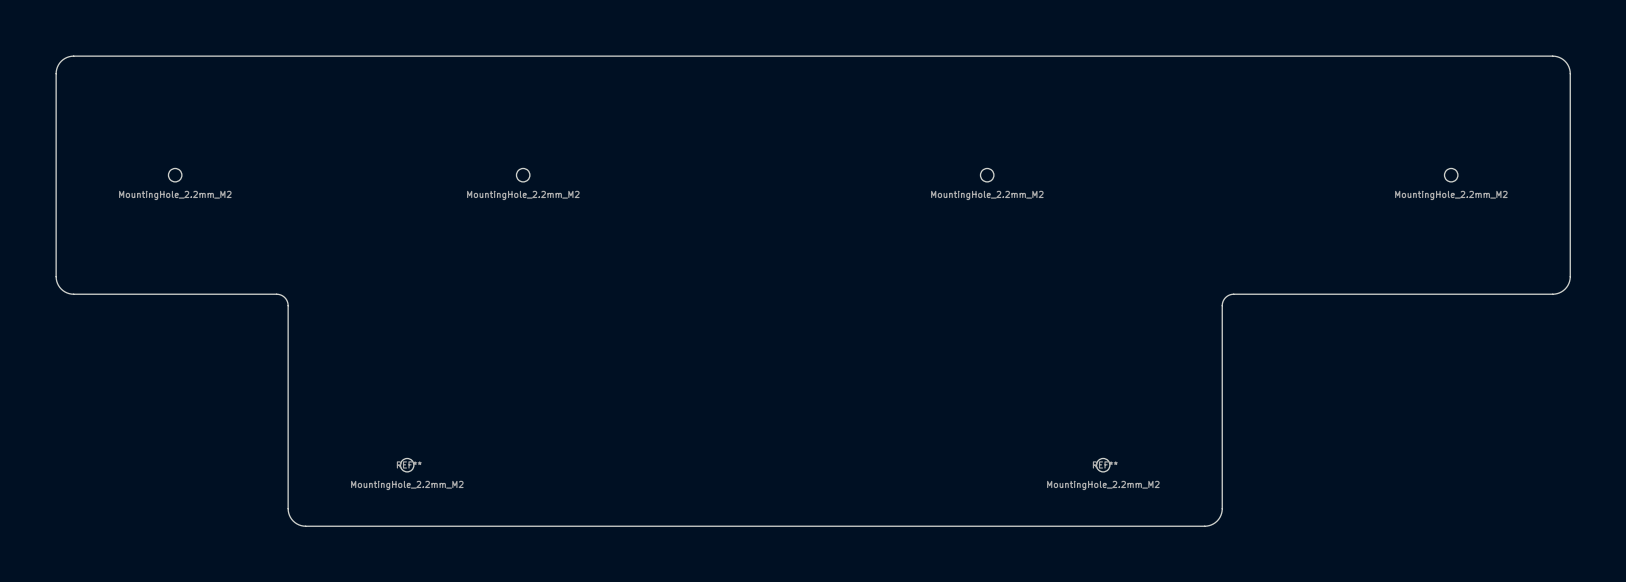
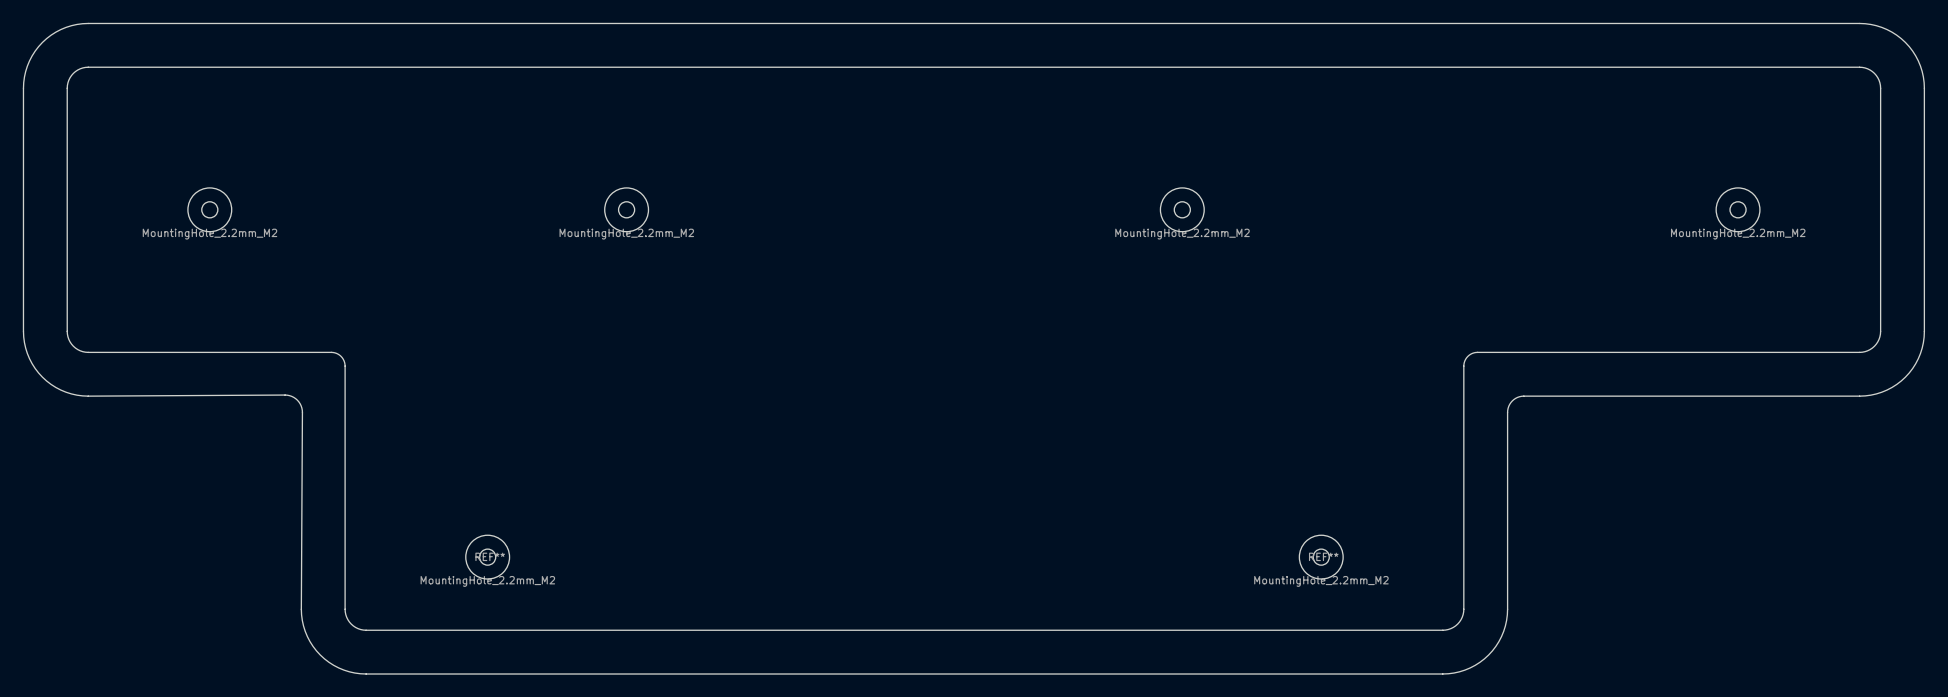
round board edge: none -> [187, 187, 232, 232]
round board edge: none -> [604, 187, 649, 232]
round board edge: none -> [1160, 187, 1205, 232]
round board edge: none -> [1715, 187, 1761, 232]
board edge: none -> (88, 396) (285, 395) (297, 400) (302, 412) (302, 620) (307, 636) (320, 655) (333, 665) (354, 673) (1454, 673) (1470, 667) (1484, 658) (1495, 646) (1505, 626) (1507, 609) (1507, 412) (1509, 404) (1515, 398) (1523, 396) (1865, 395) (1891, 387) (1909, 373) (1918, 358) (1924, 337) (1923, 77) (1915, 55) (1901, 38) (1881, 27) (1859, 23) (77, 24) (60, 29) (42, 42) (29, 60) (24, 77) (23, 331) (29, 358) (42, 377) (66, 392) (88, 396)
round board edge: none -> [465, 535, 510, 580]
round board edge: none -> [1299, 535, 1344, 580]

